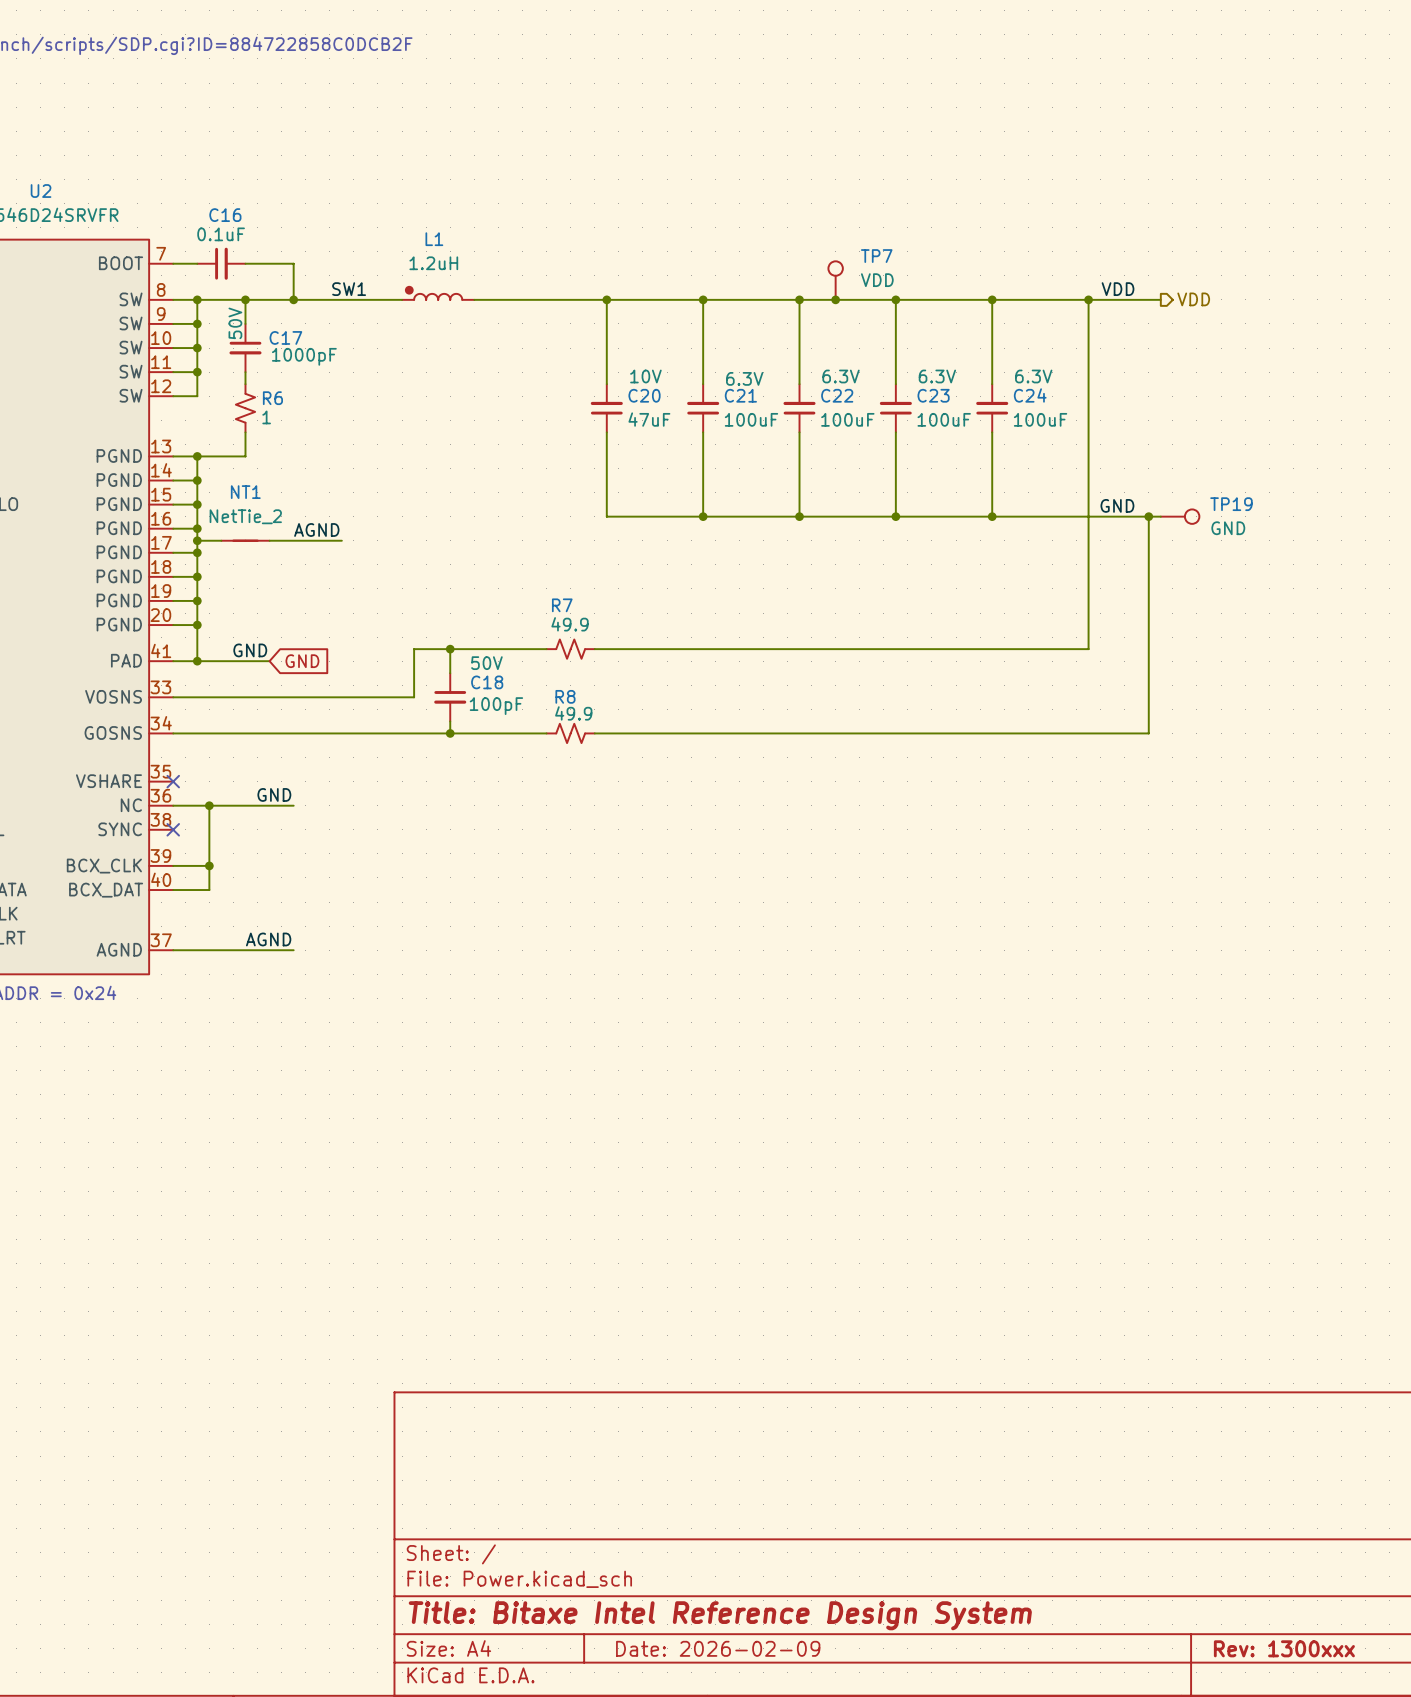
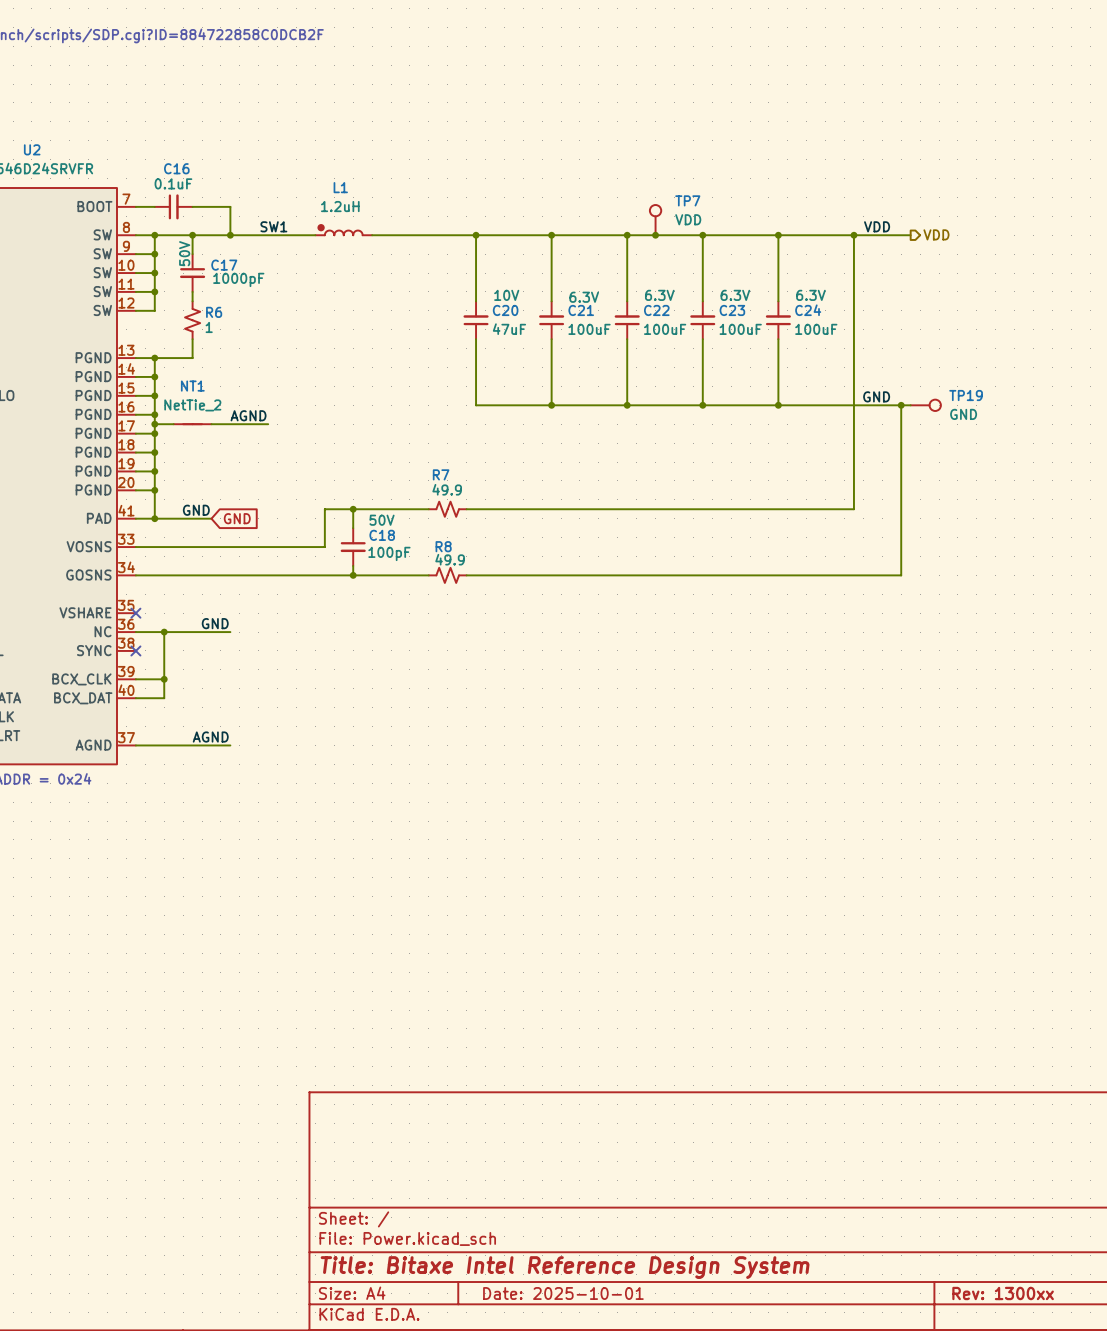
title block: Date: 2026-02-09 (718, 1648) -> Date: 2025-10-01 (563, 1293)
title block: Rev: 1300xxx (1284, 1648) -> Rev: 1300xx (1003, 1293)

